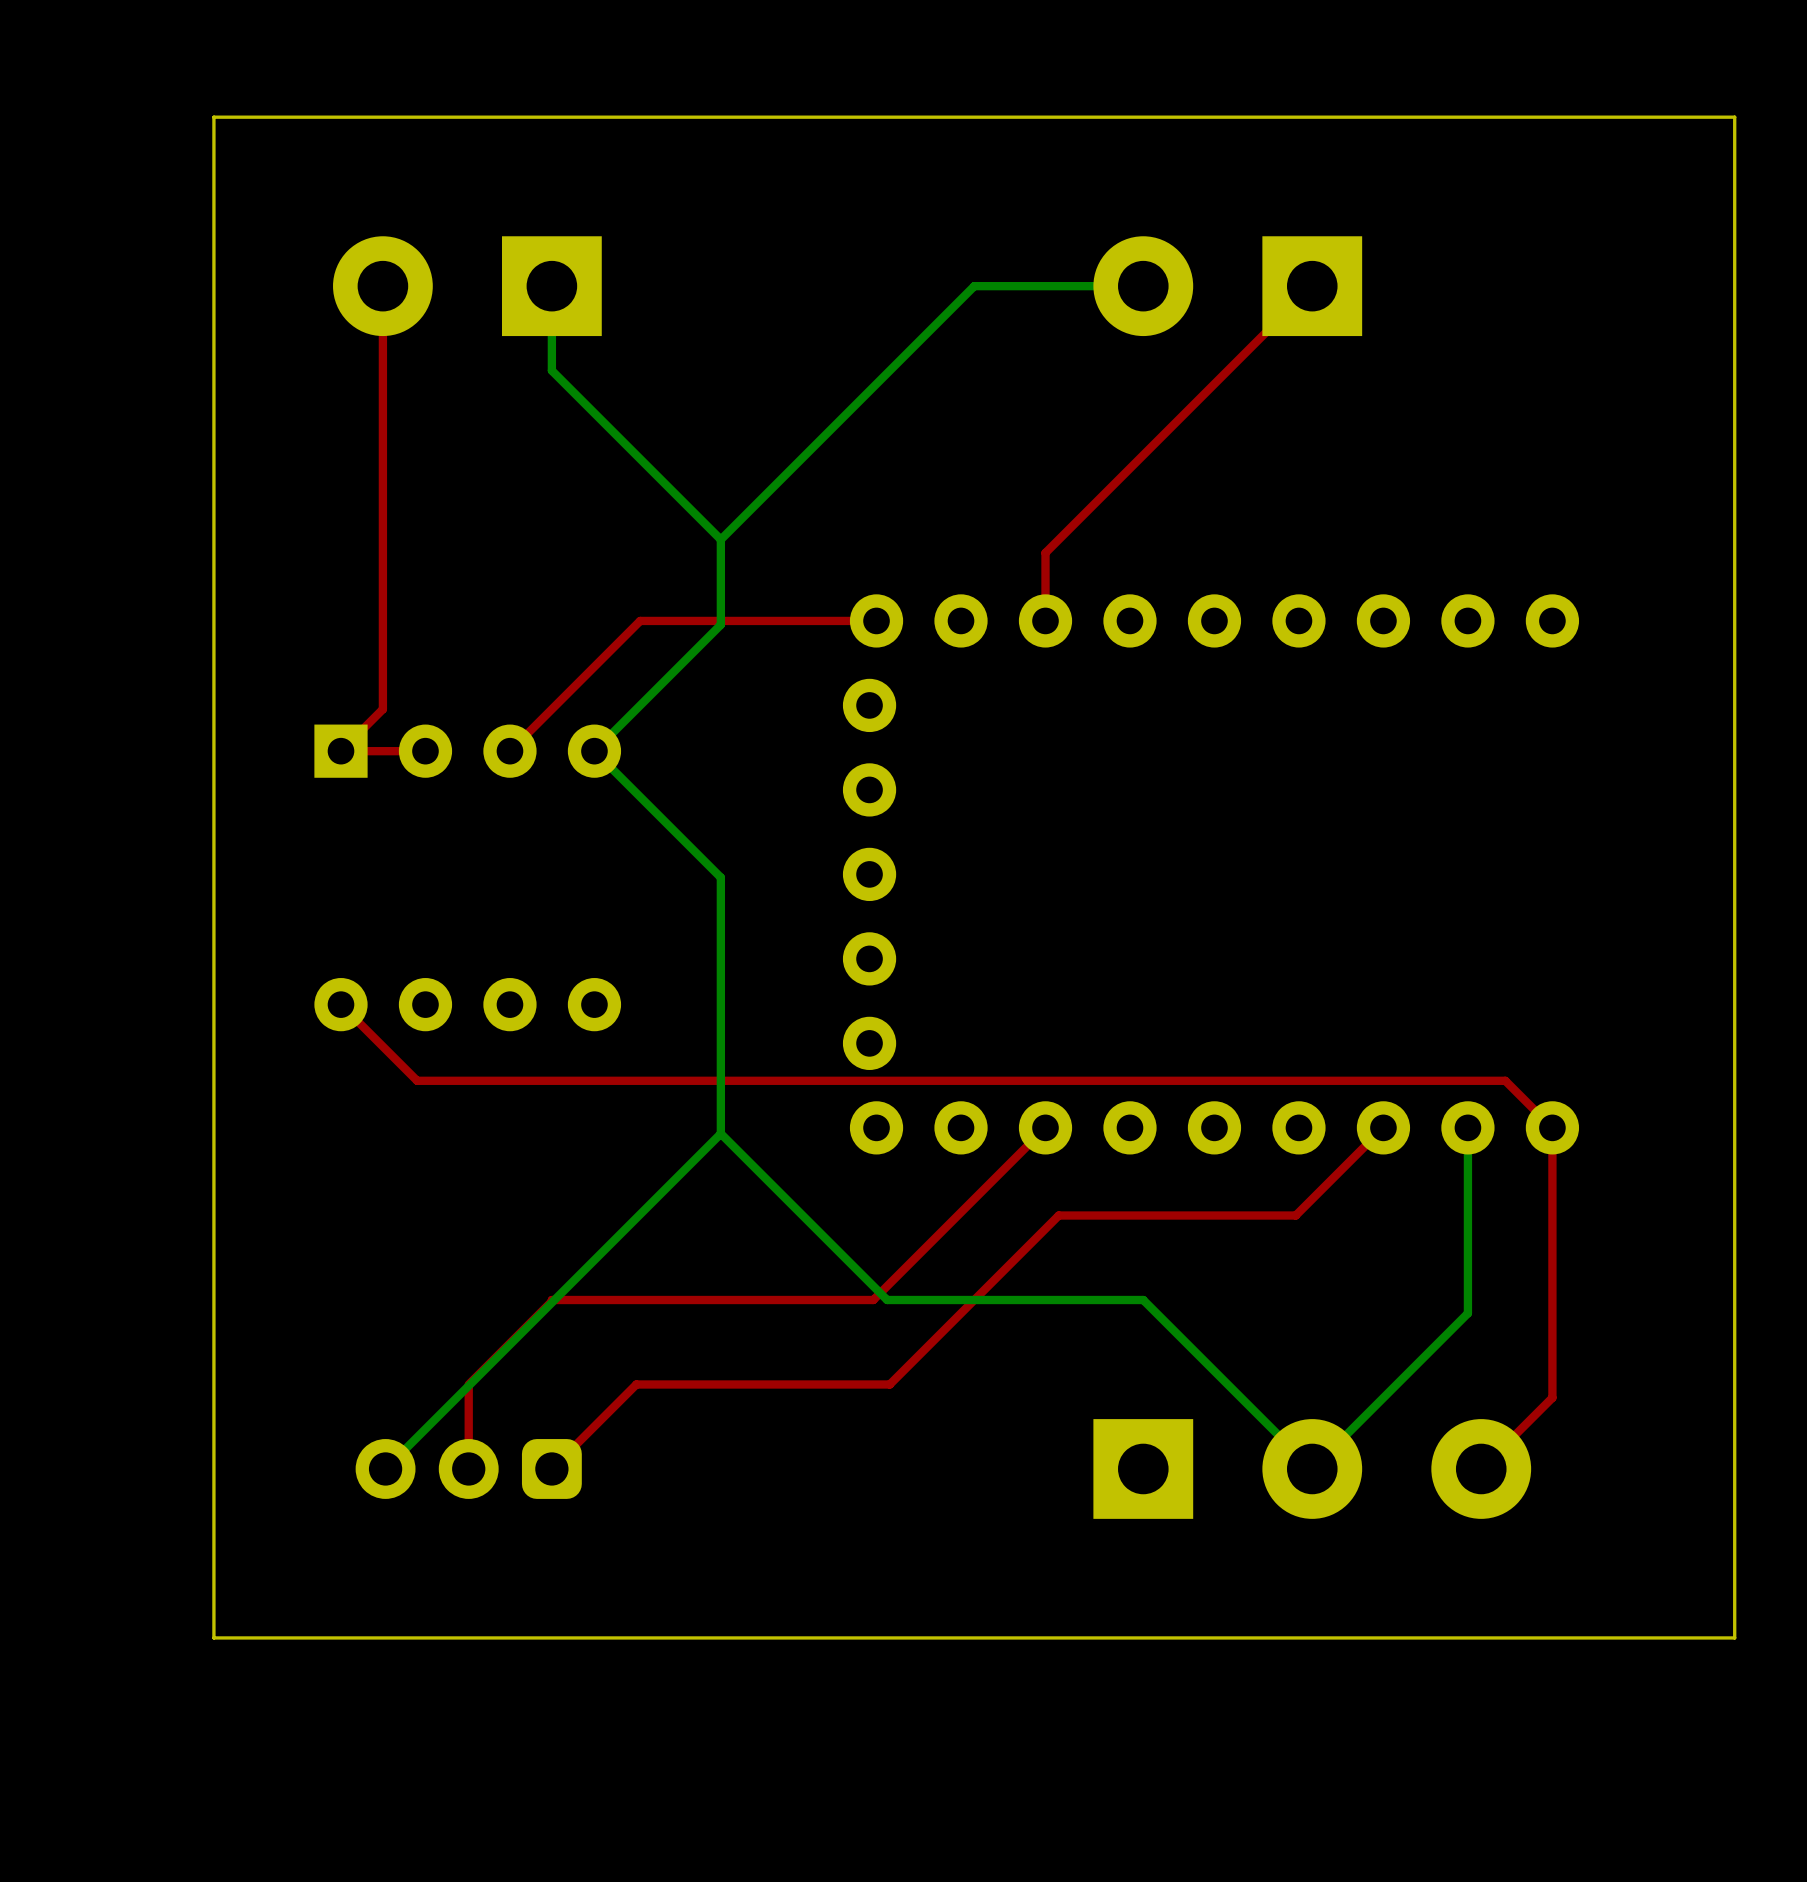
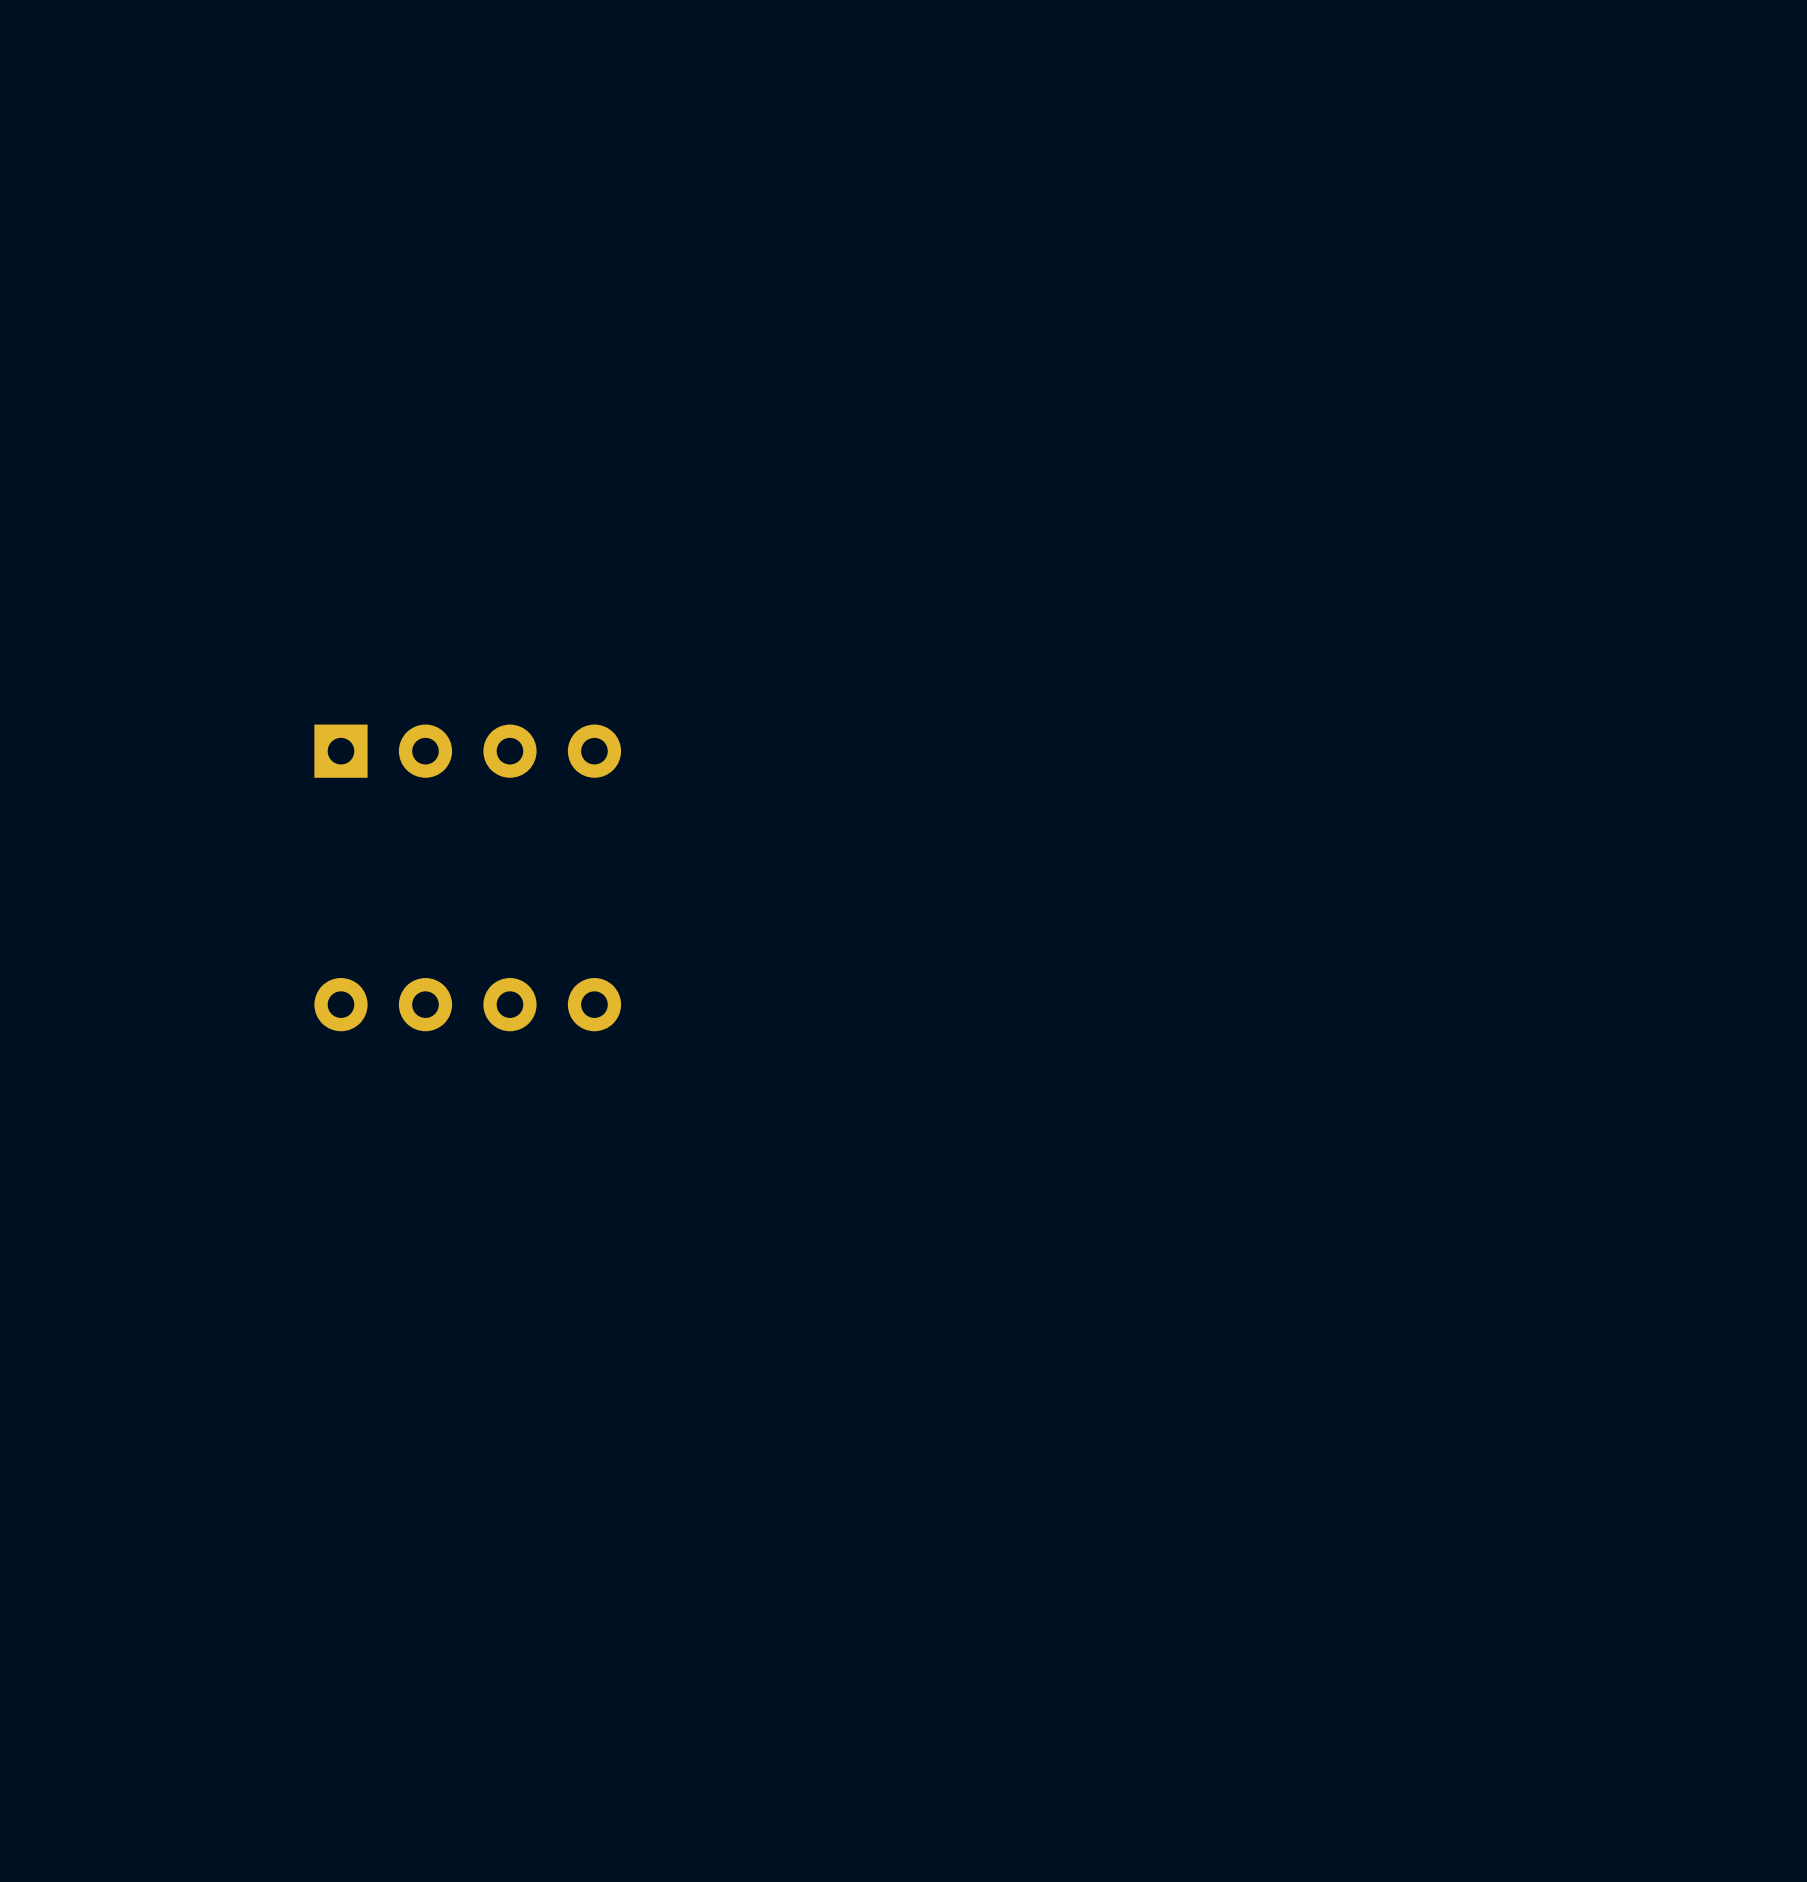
board edge: (1734, 117) (1734, 1637) (213, 1637) (213, 117) (1734, 117) -> none
top track: (382, 286) (382, 709) (340, 751) (425, 751) -> none
part: (467, 286) -> none
bottom track: (551, 286) (551, 370) (720, 539) -> none
bottom track: (1143, 286) (974, 286) (720, 539) -> none
part: (1227, 286) -> none
top track: (1312, 286) (1045, 552) (1045, 620) -> none
bottom track: (720, 539) (720, 624) (594, 751) (720, 877) (720, 1133) -> none
top track: (876, 620) (640, 620) (509, 751) -> none
part: (1210, 874) -> none
top track: (340, 1004) (417, 1080) (1505, 1080) (1552, 1127) (1552, 1397) (1481, 1468) -> none
top track: (1045, 1127) (873, 1300) (551, 1300) (468, 1384) -> none
top track: (1383, 1127) (1295, 1215) (1058, 1215) (889, 1384) (636, 1384) (551, 1468) -> none
bottom track: (1467, 1127) (1467, 1313) (1312, 1468) (1143, 1300) (887, 1300) (720, 1133) -> none
bottom track: (720, 1133) (385, 1468) -> none
top track: (468, 1385) (468, 1468) -> none
part: (468, 1468) -> none
part: (1312, 1468) -> none

